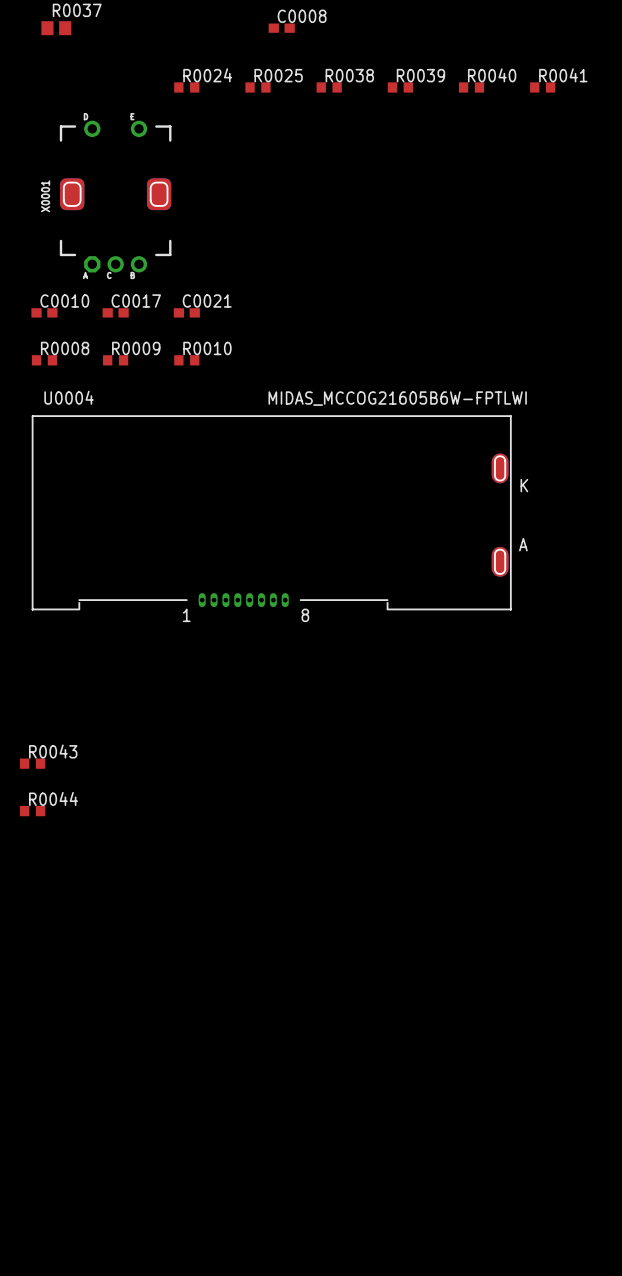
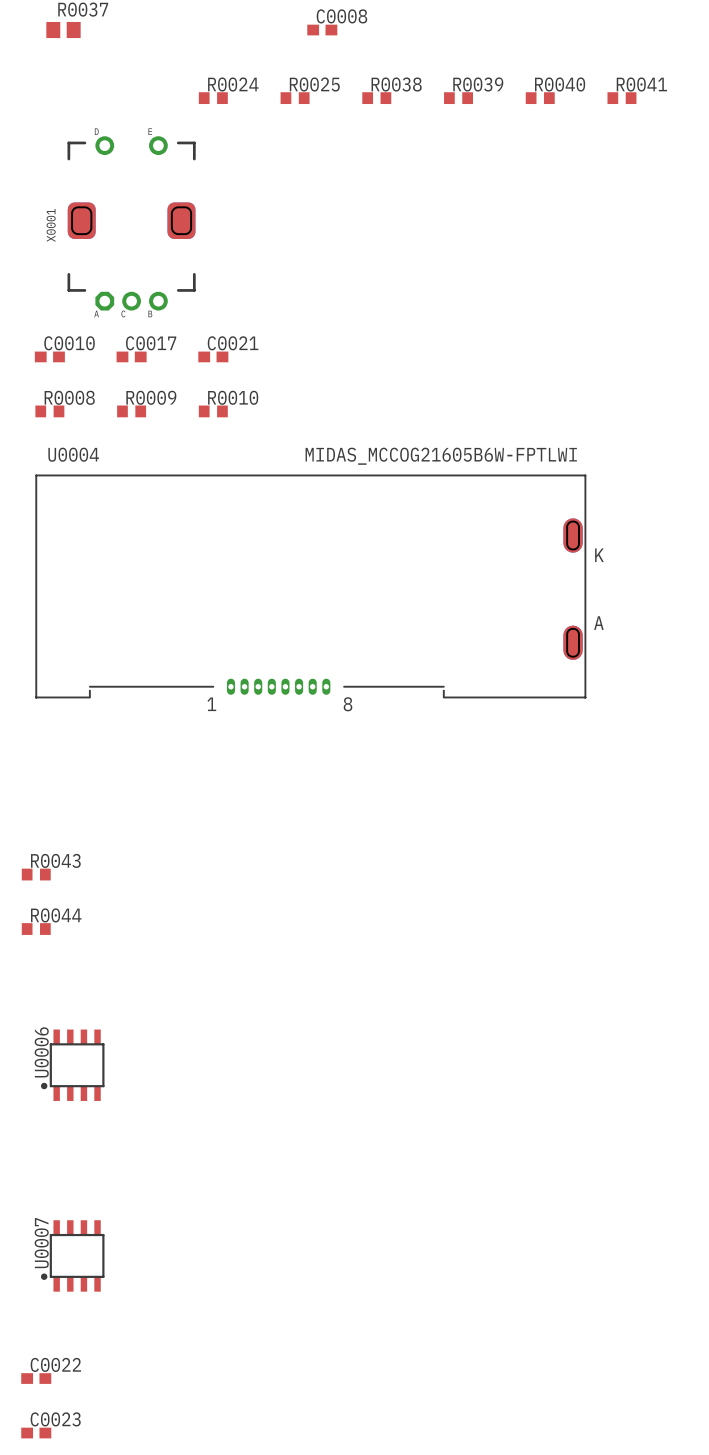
U0006: none -> (72, 1065)
U0007: none -> (72, 1255)
C0022: none -> (36, 1378)
C0023: none -> (36, 1433)

